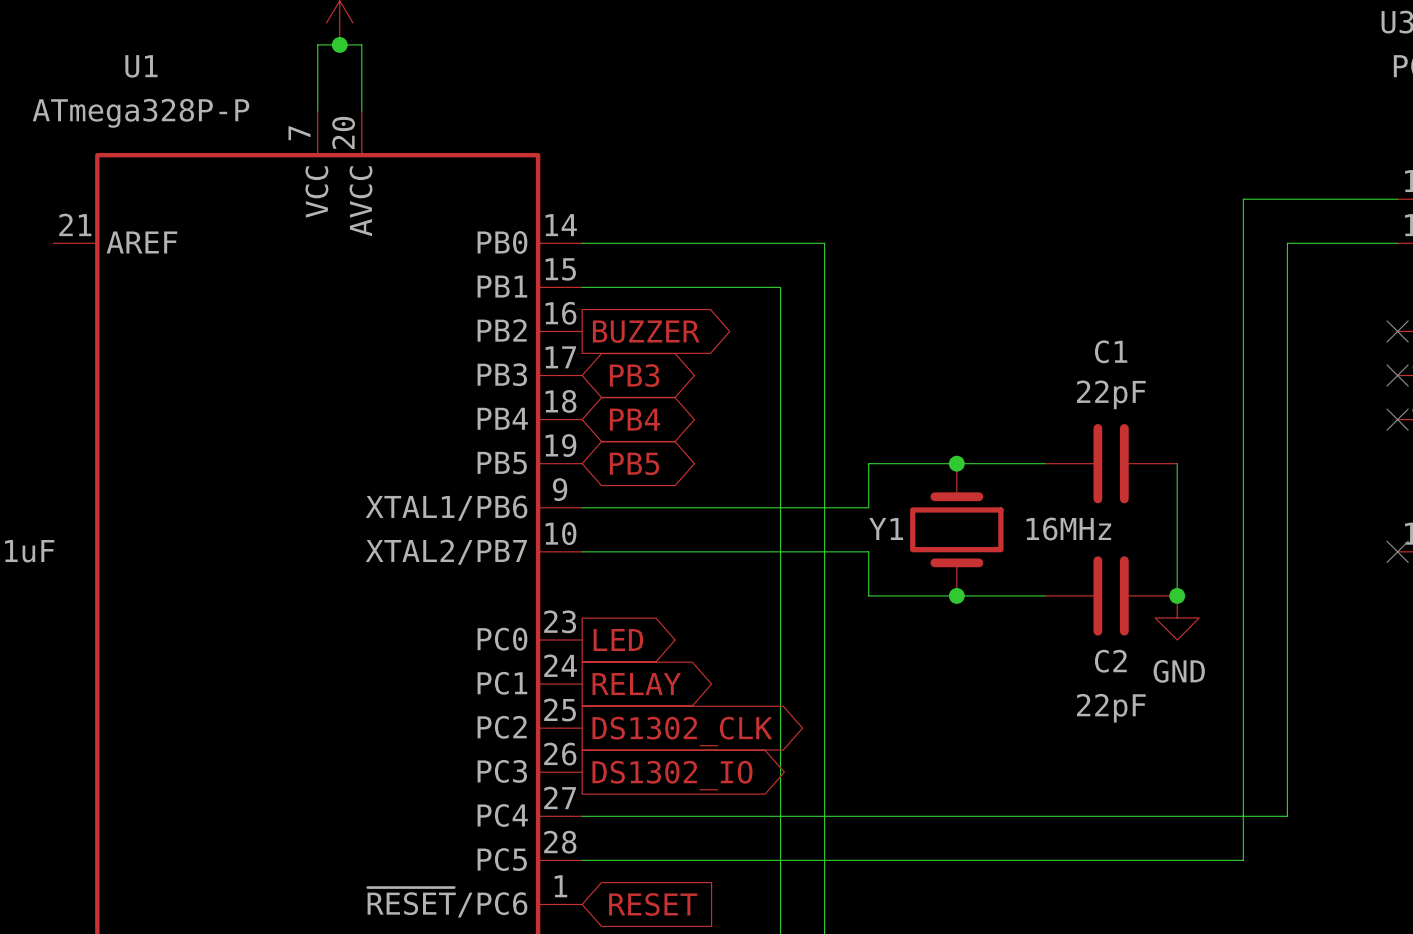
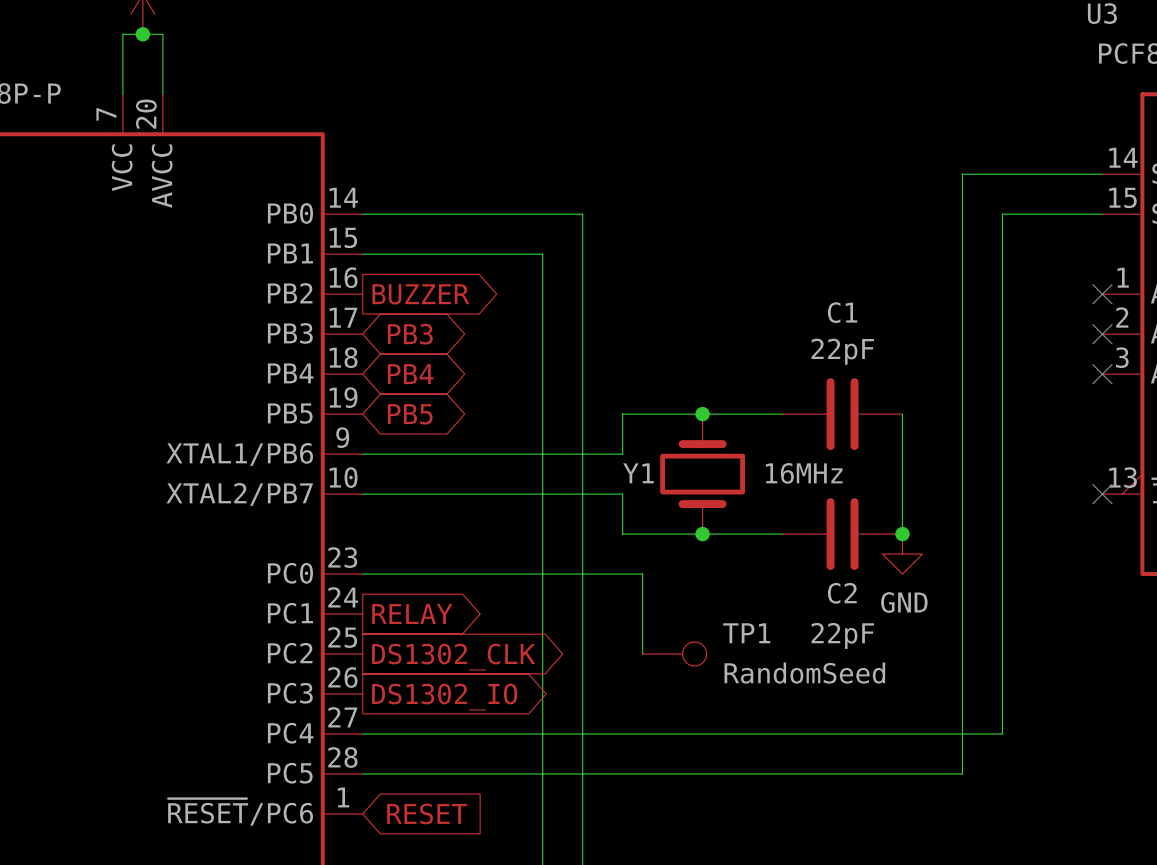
wire: none -> (362, 574) (642, 574) (642, 654)
global label: LED (618, 640) -> none
TP1: none -> RandomSeed (674, 654)

